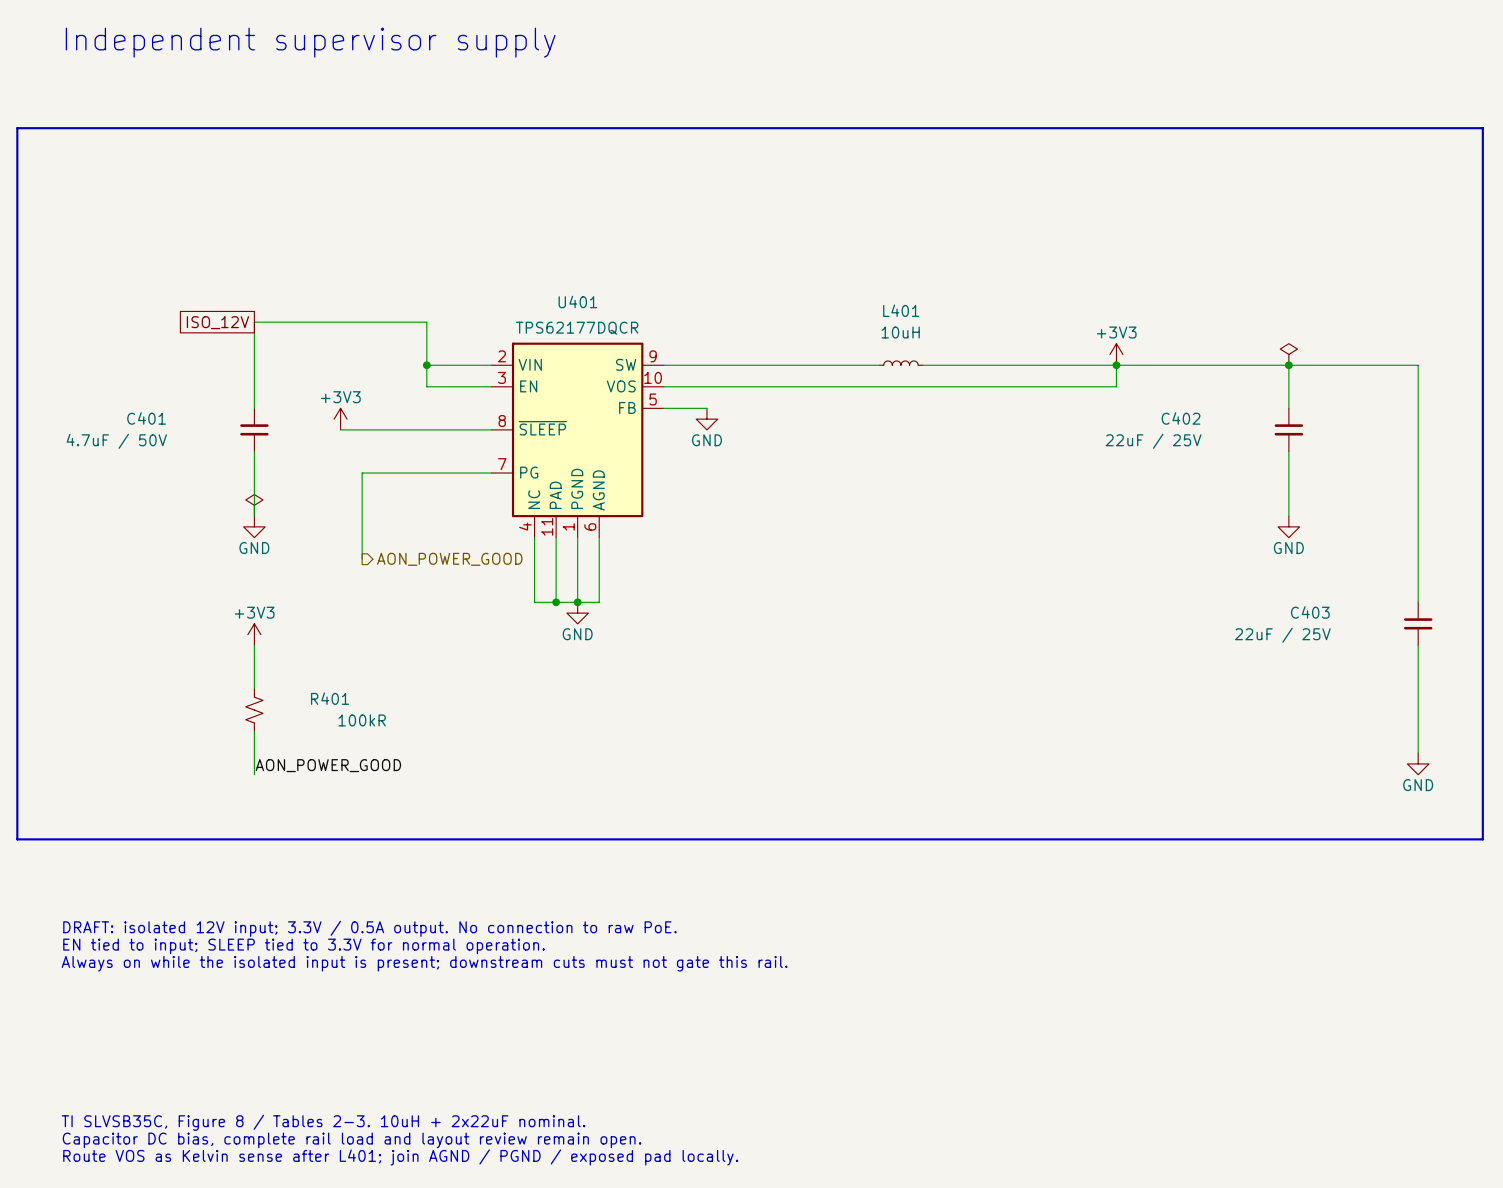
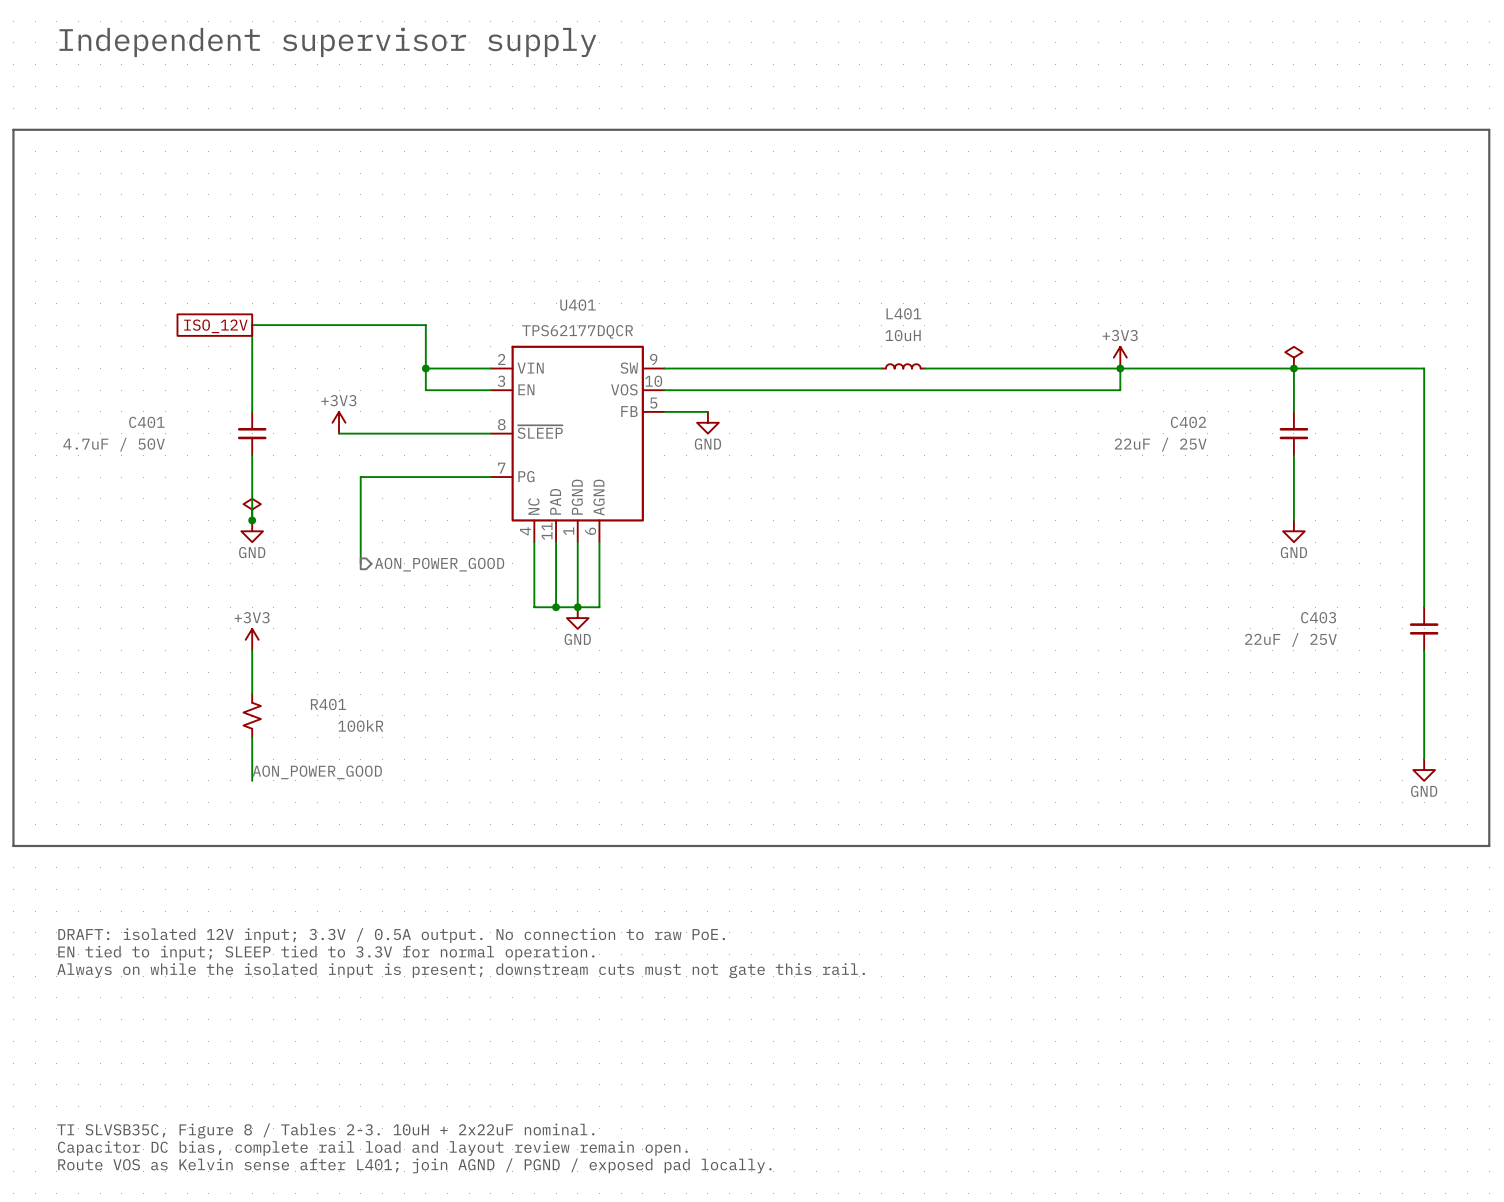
junction: none -> (252, 520)

